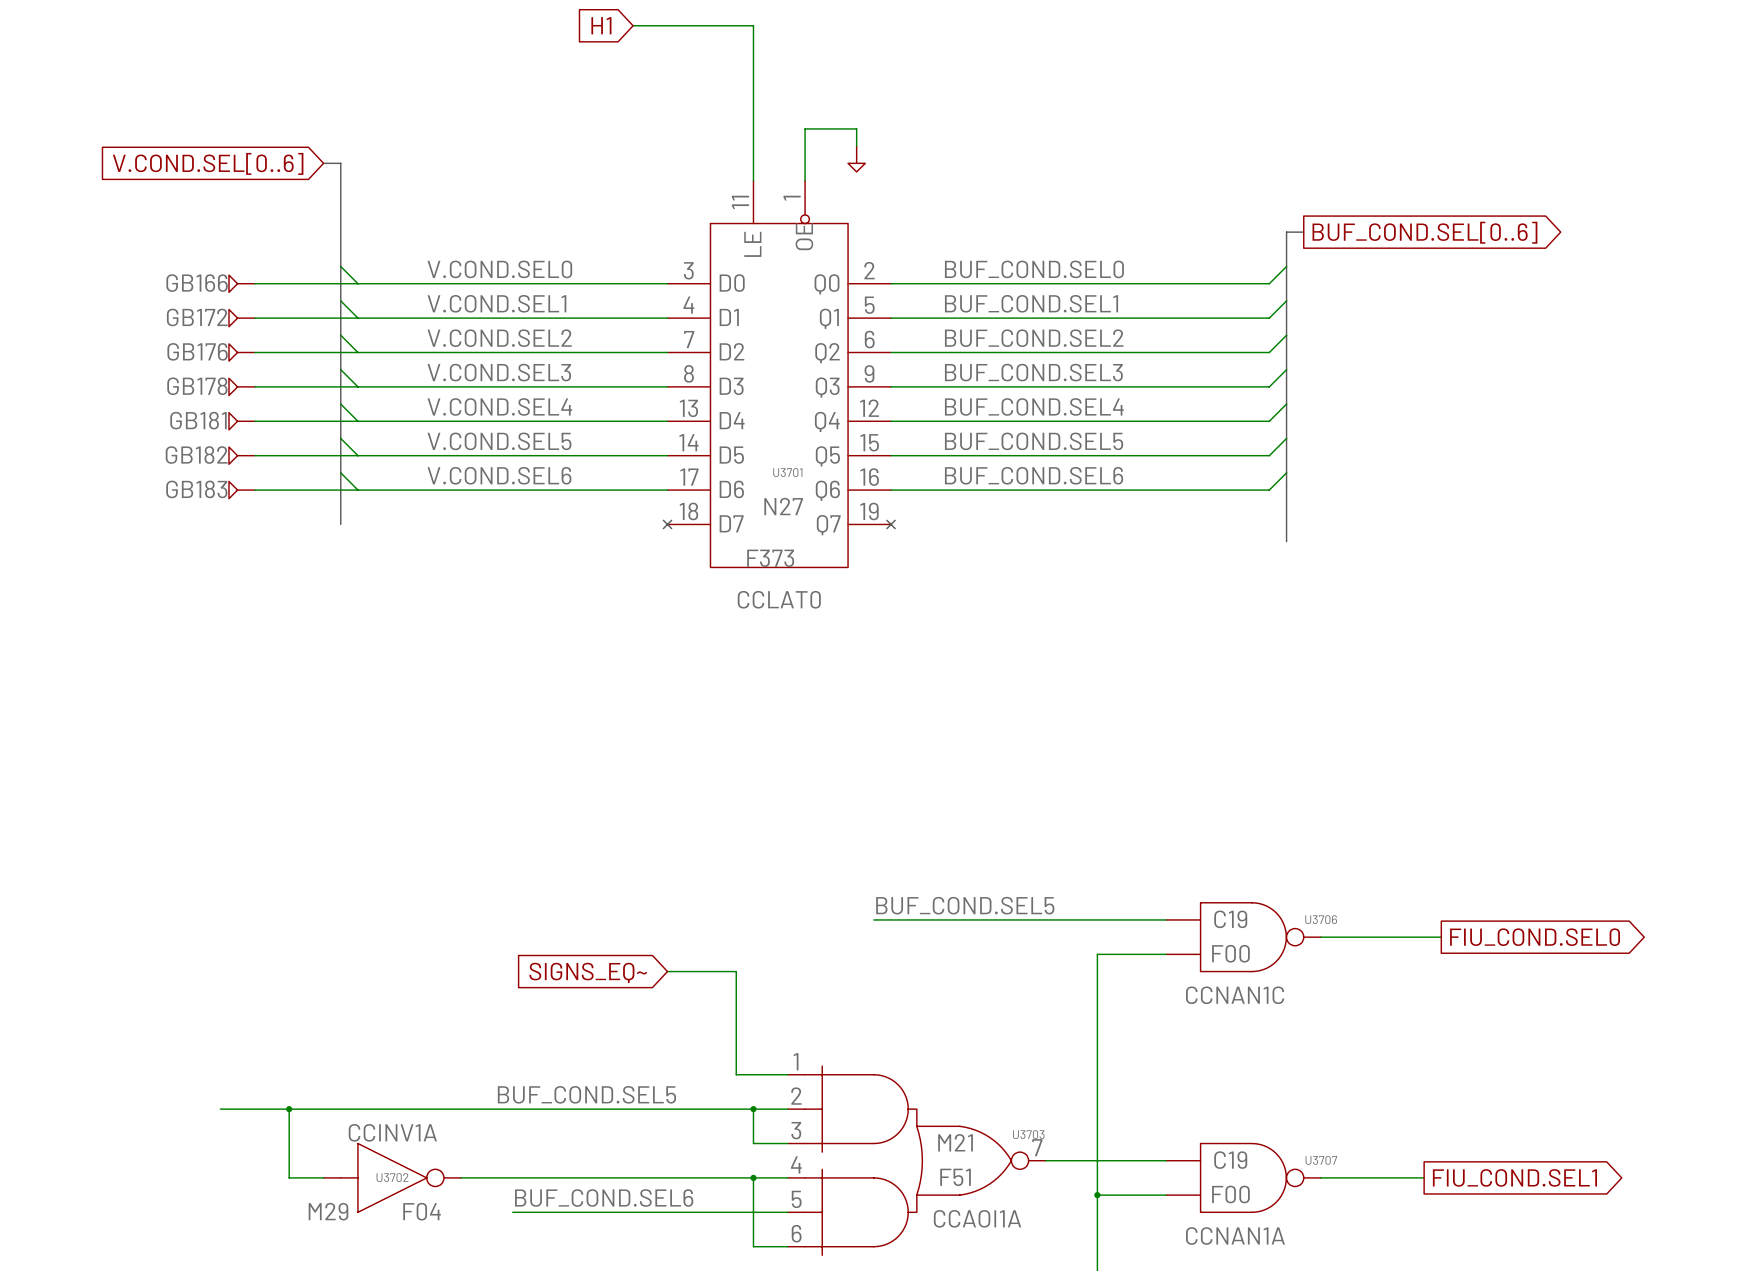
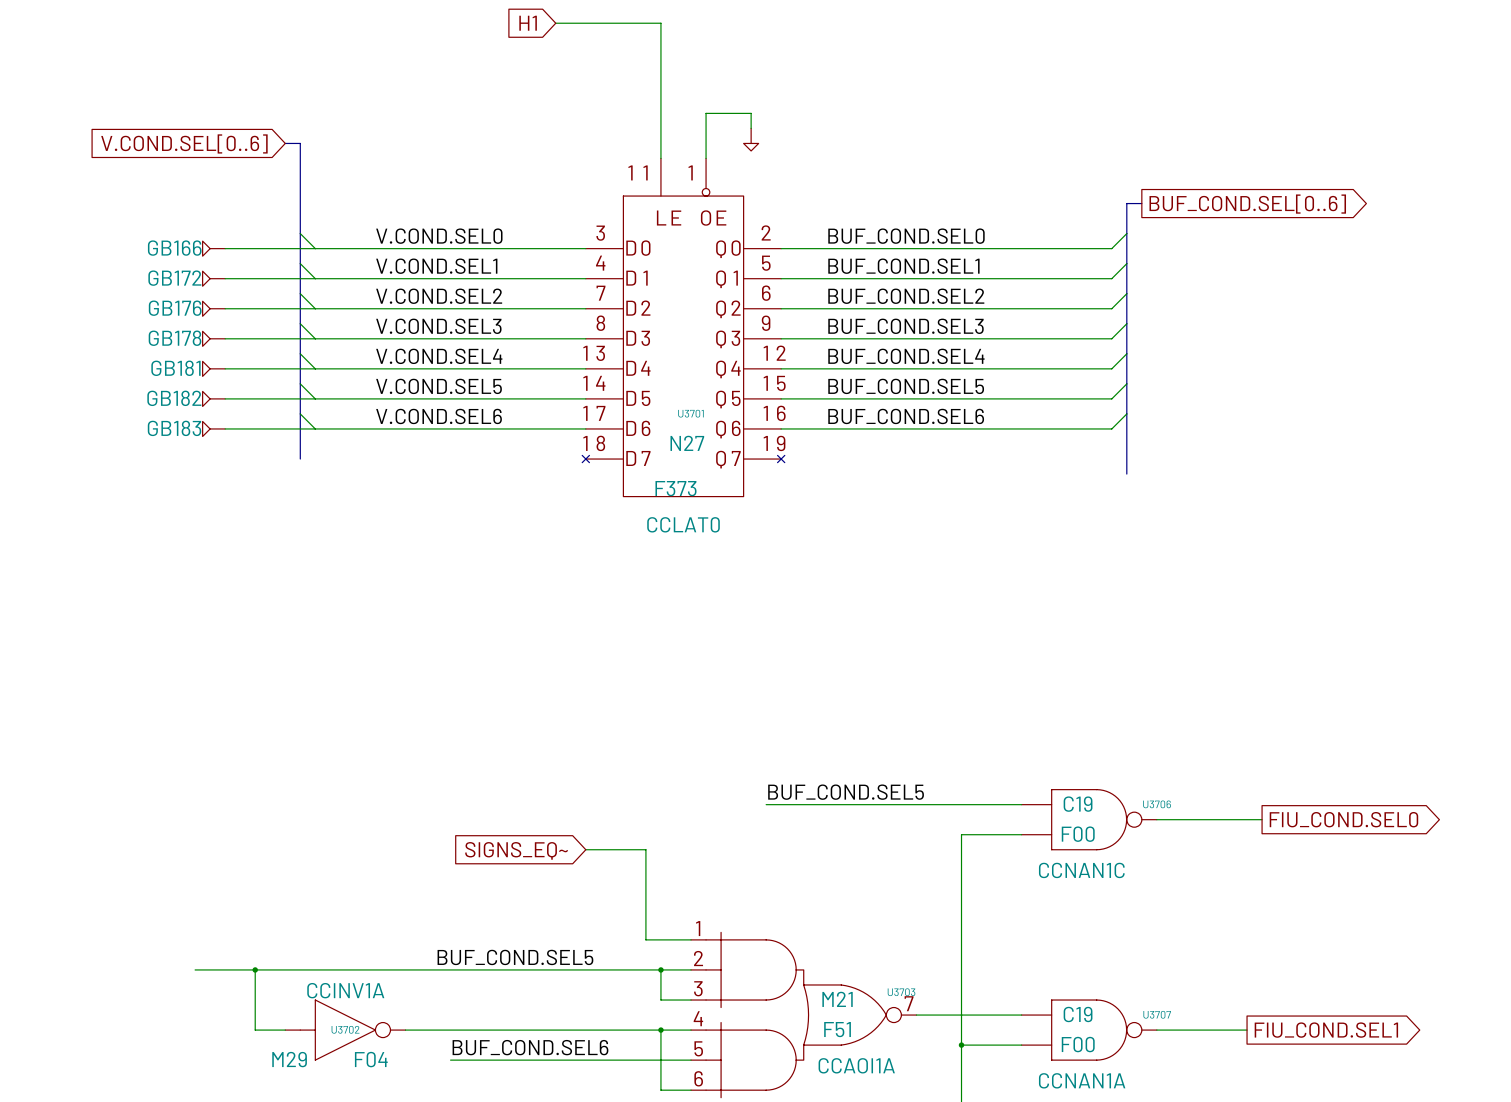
U3701 symbol: [667, 180, 892, 568] -> [585, 158, 782, 497]

